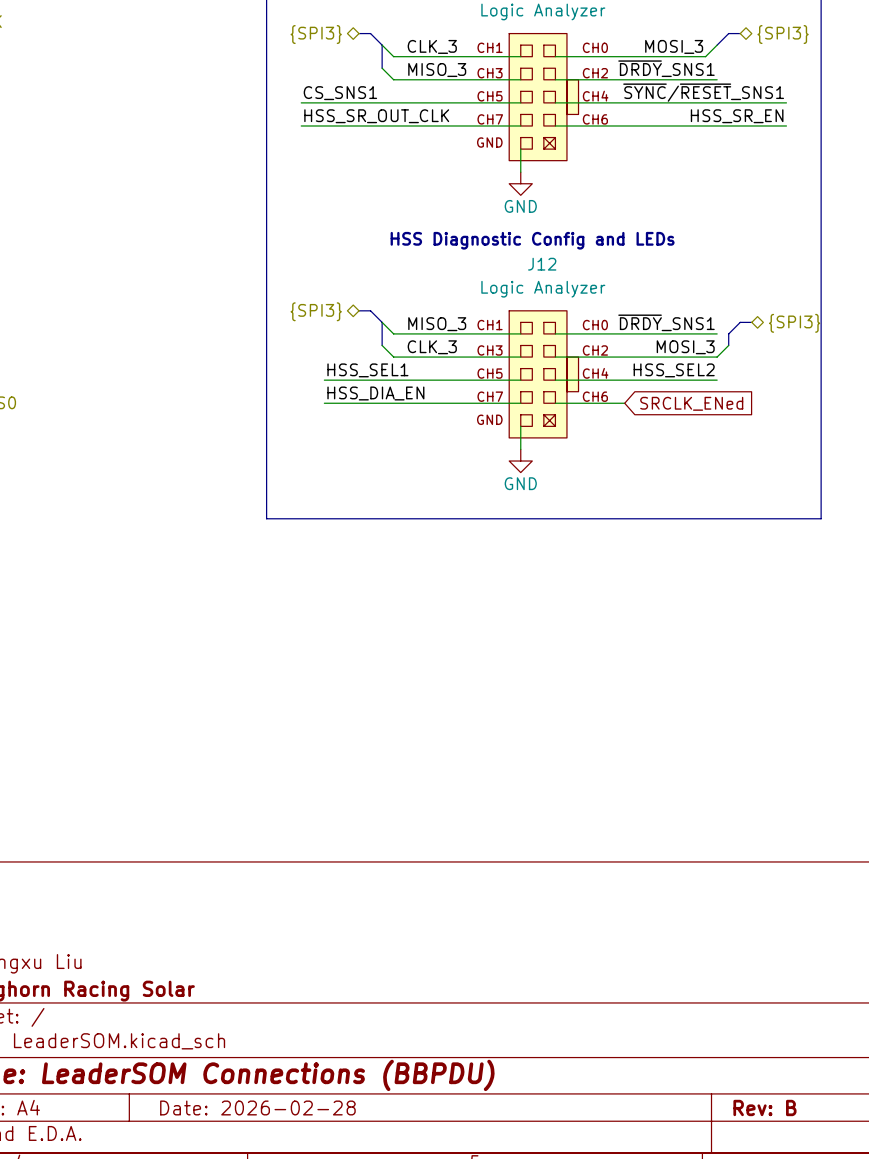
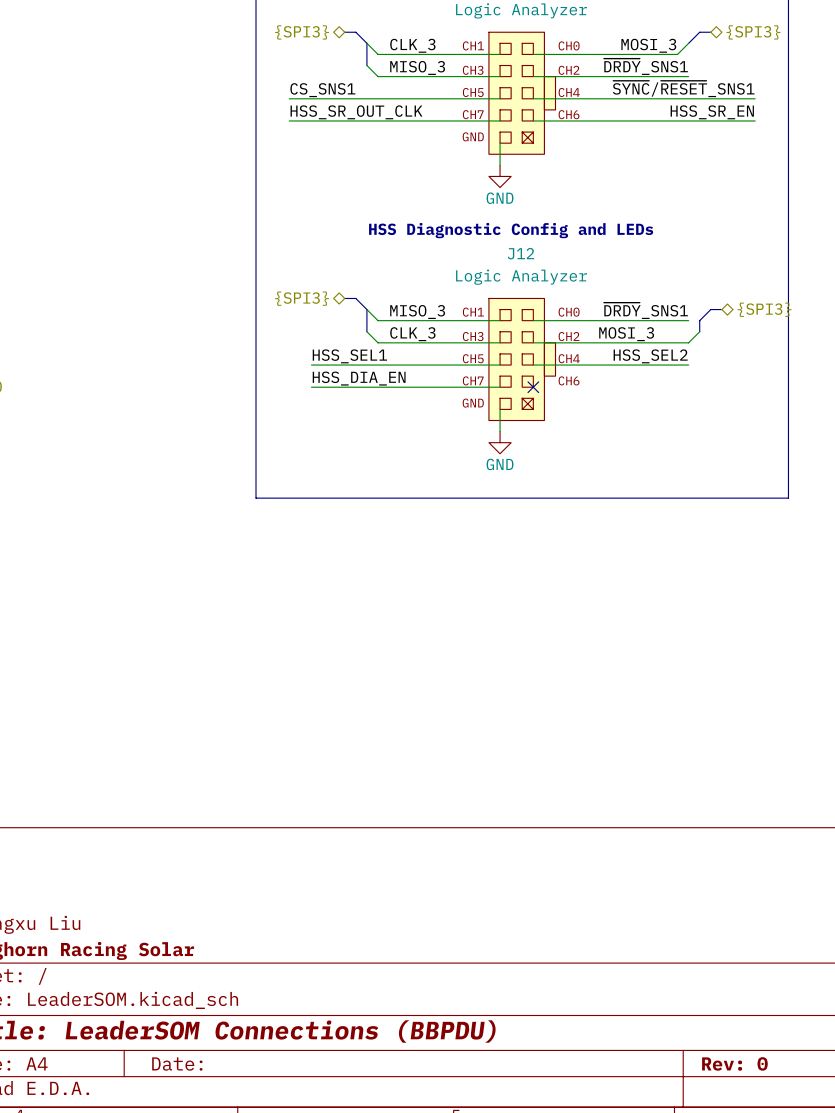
label position: MOSI_3 (685, 347) -> MOSI_3 (626, 334)
wire: (555, 403) (624, 403) -> none
no-connect mark: none -> (533, 387)
global label: SRCLK_ENed (691, 403) -> none
title block: Date: 2026-02-28 (257, 1107) -> Date: (177, 1064)
title block: Rev: B (764, 1107) -> Rev: 0 (734, 1063)

